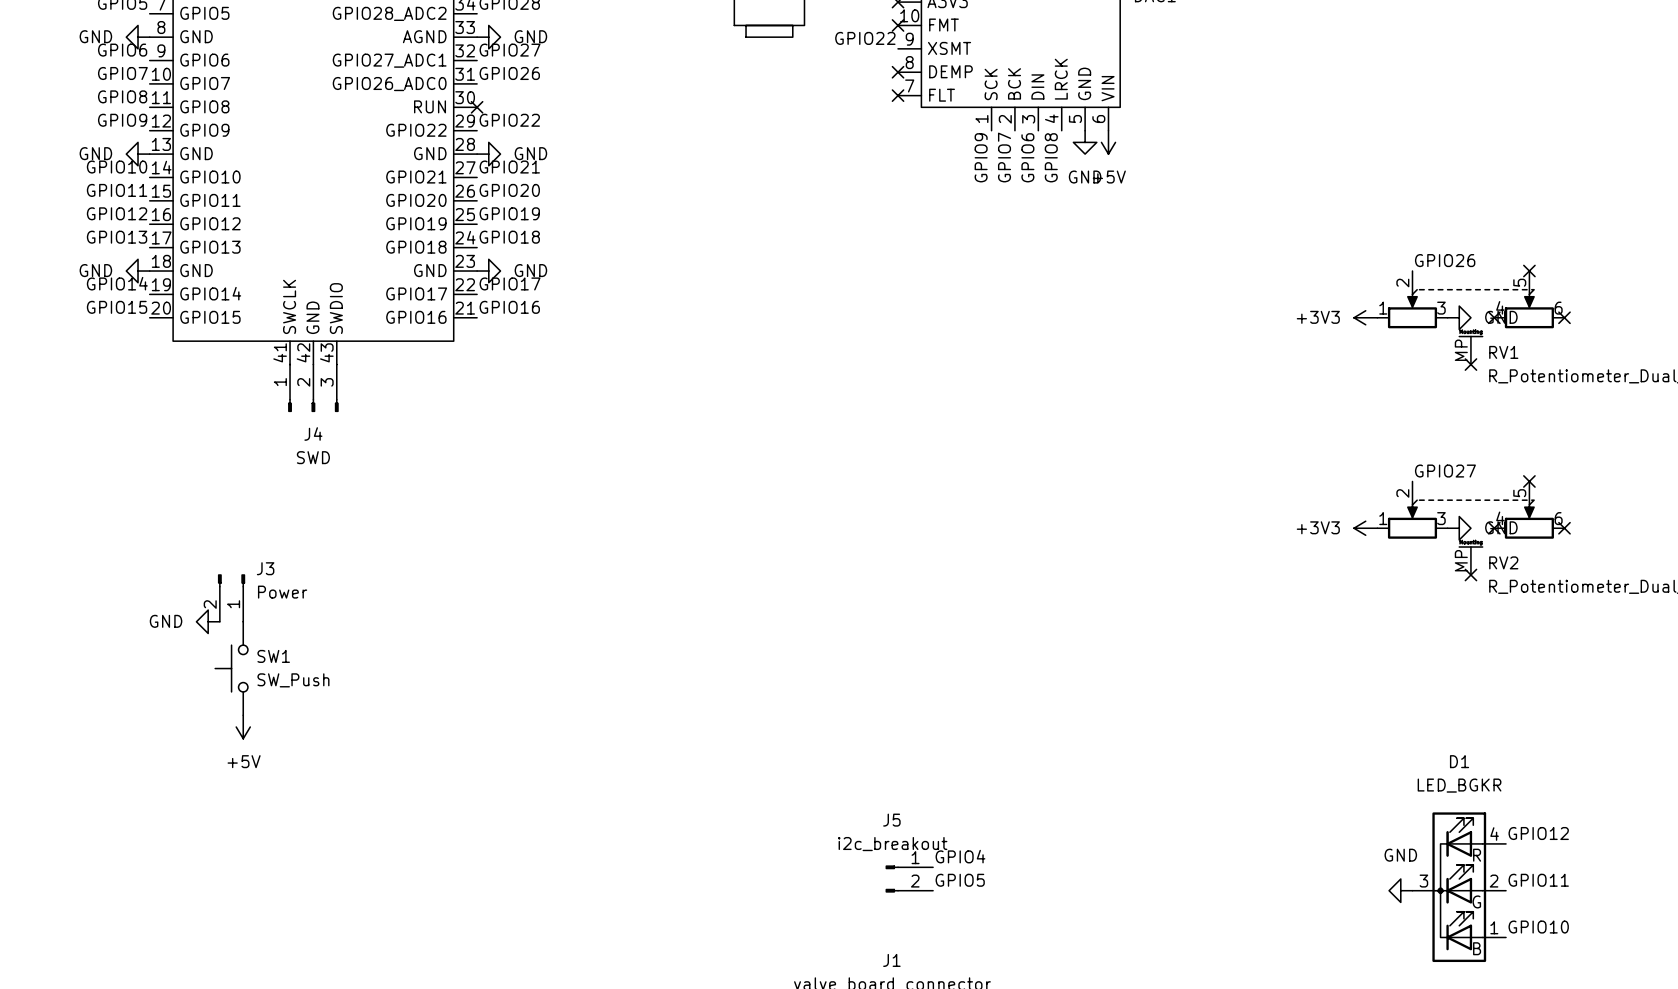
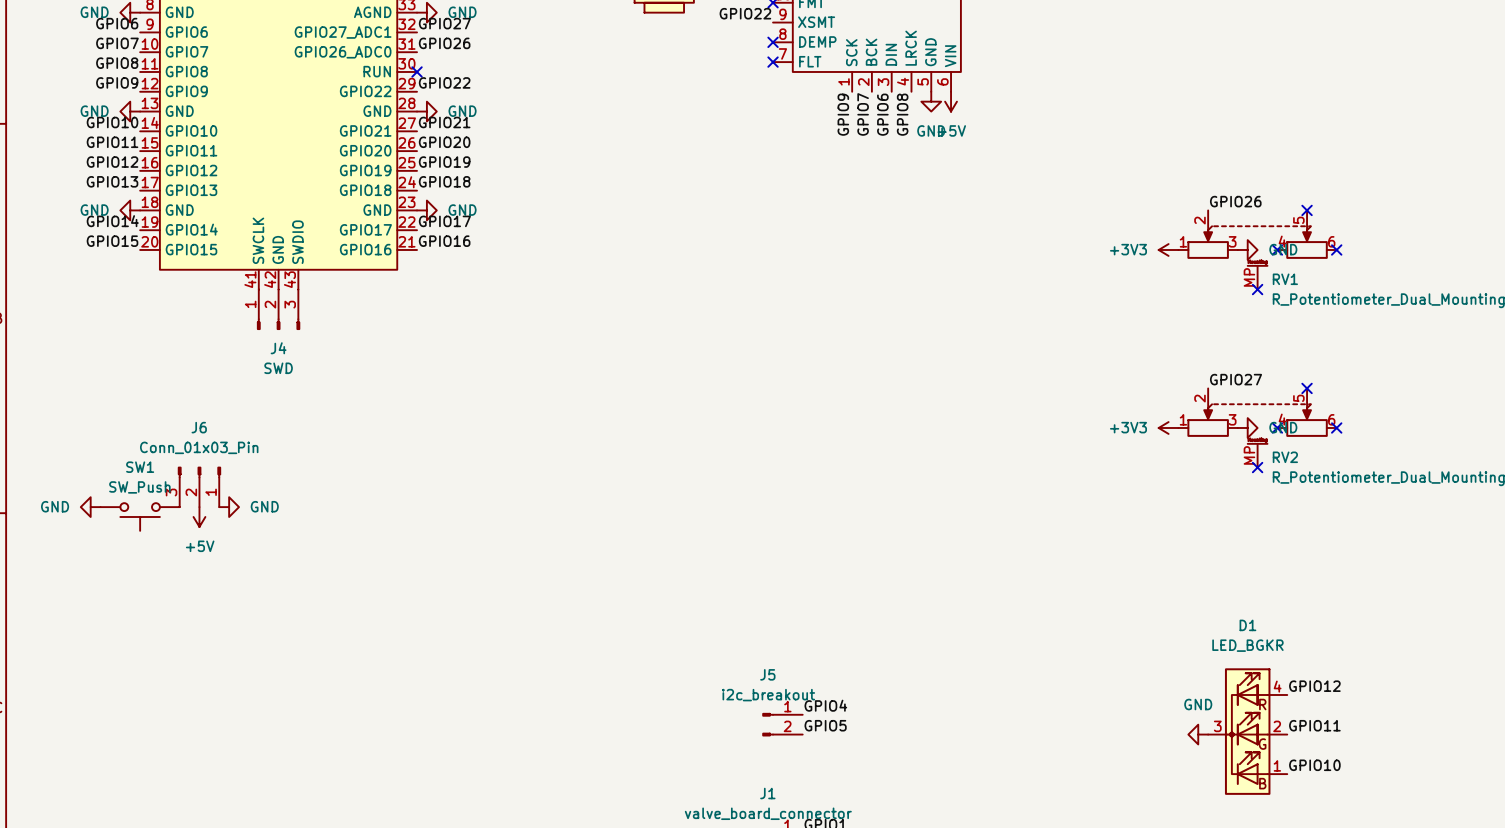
J6: none -> Conn_01x03_Pin (199, 487)
J3: Power (231, 598) -> none
power symbol: none -> GND (90, 507)
power symbol rotation: 0° (208, 621) -> 180° (229, 507)
power symbol position: GND (208, 621) -> GND (229, 507)
SW1 rotation: 0° (231, 668) -> 90° counterclockwise (140, 516)
SW1 position: (231, 668) -> (140, 516)
SW1 value position: SW_Push (293, 680) -> SW_Push (139, 487)
power symbol position: +5V (243, 727) -> +5V (199, 516)

